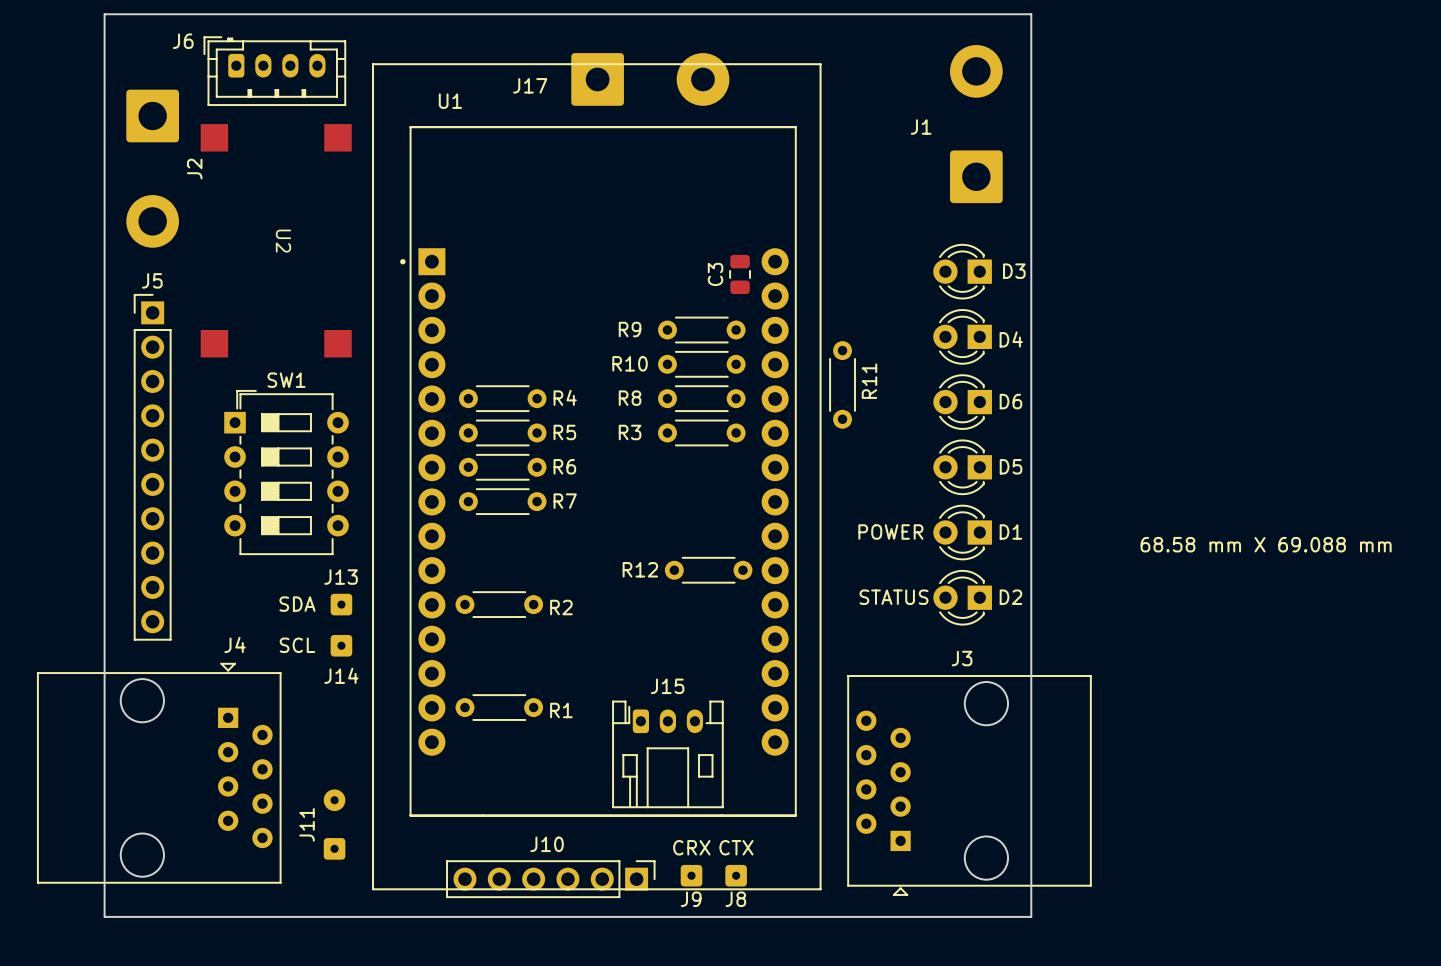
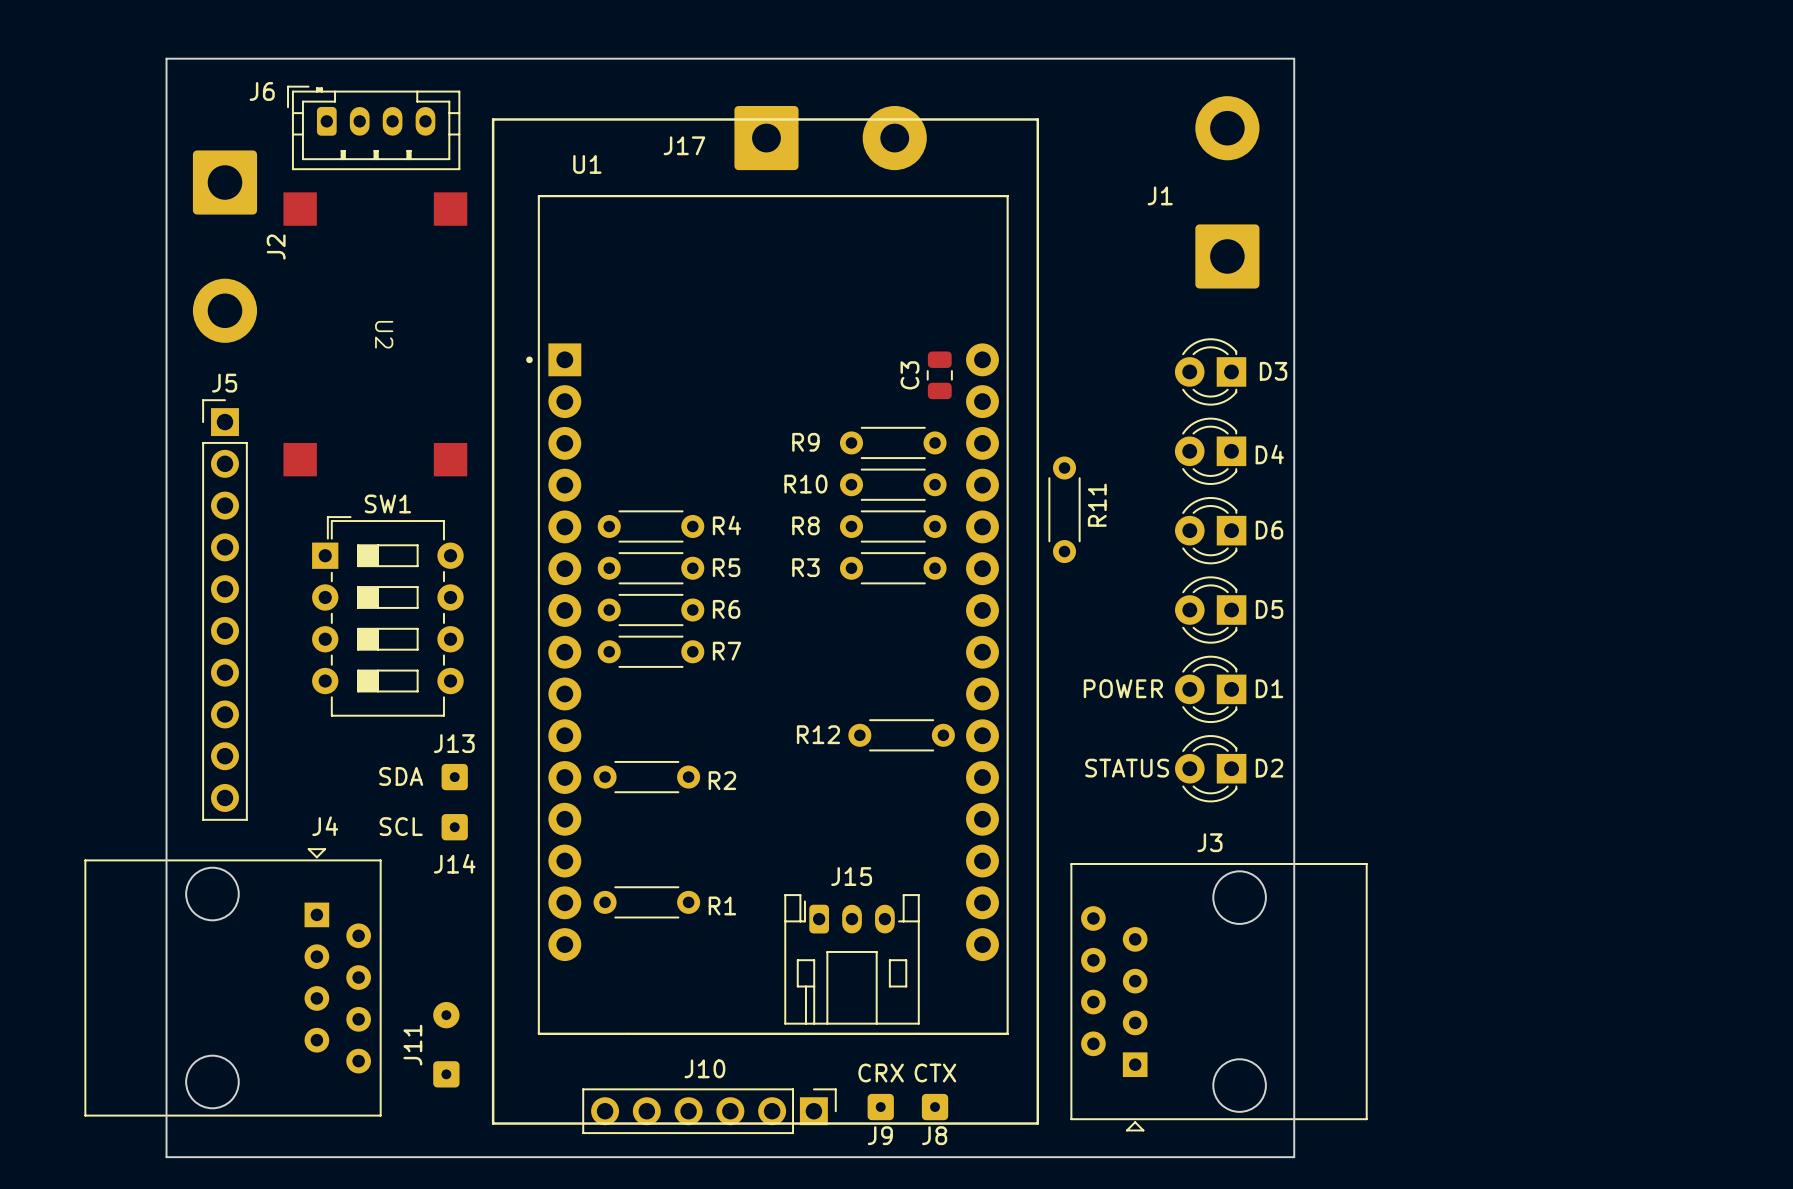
text: 68.58 mm X 69.088 mm (1266, 544) -> none

